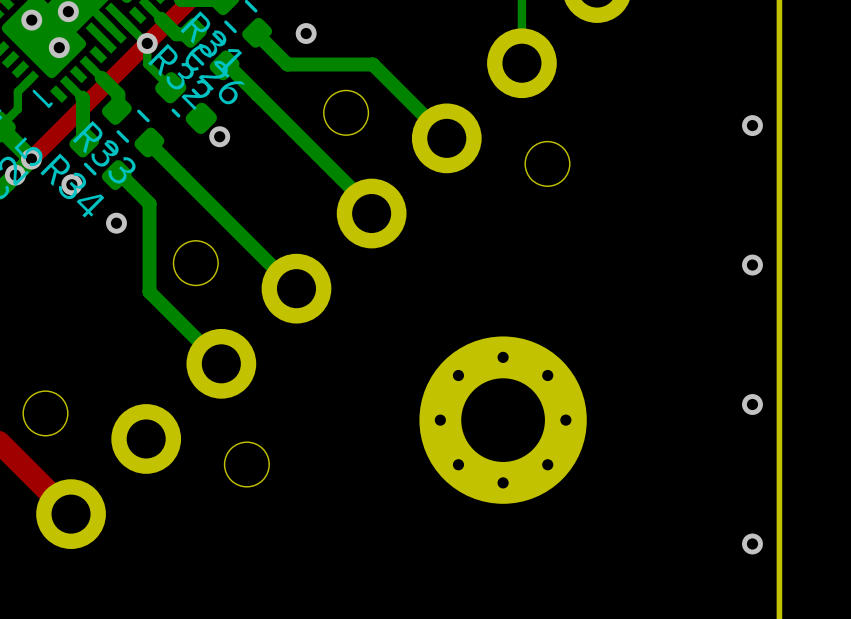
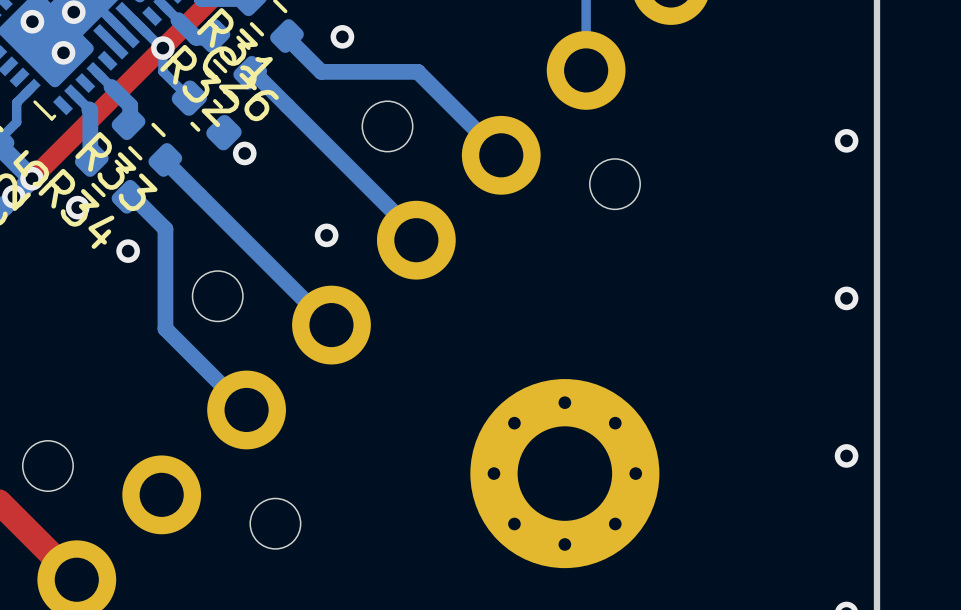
via: none -> (326, 235)

